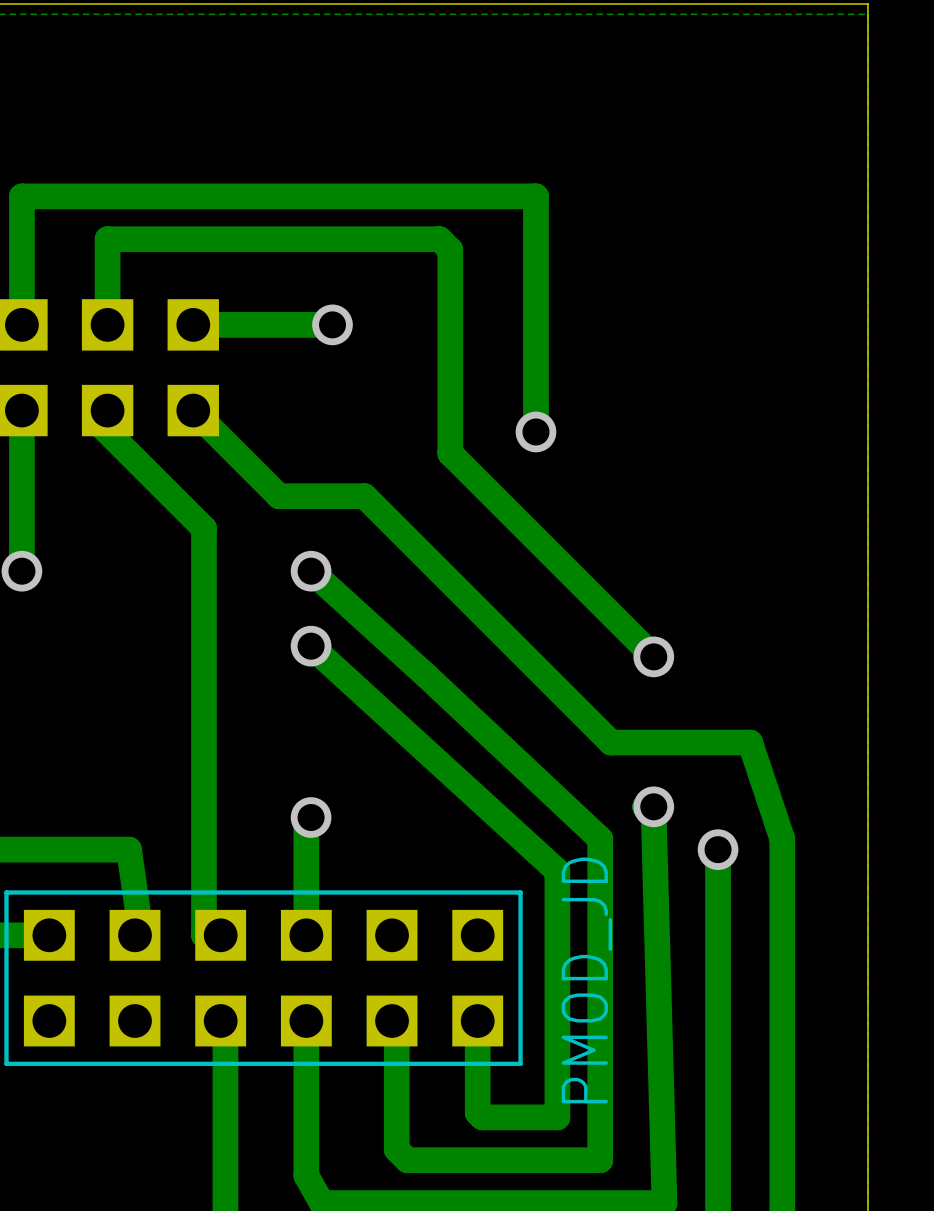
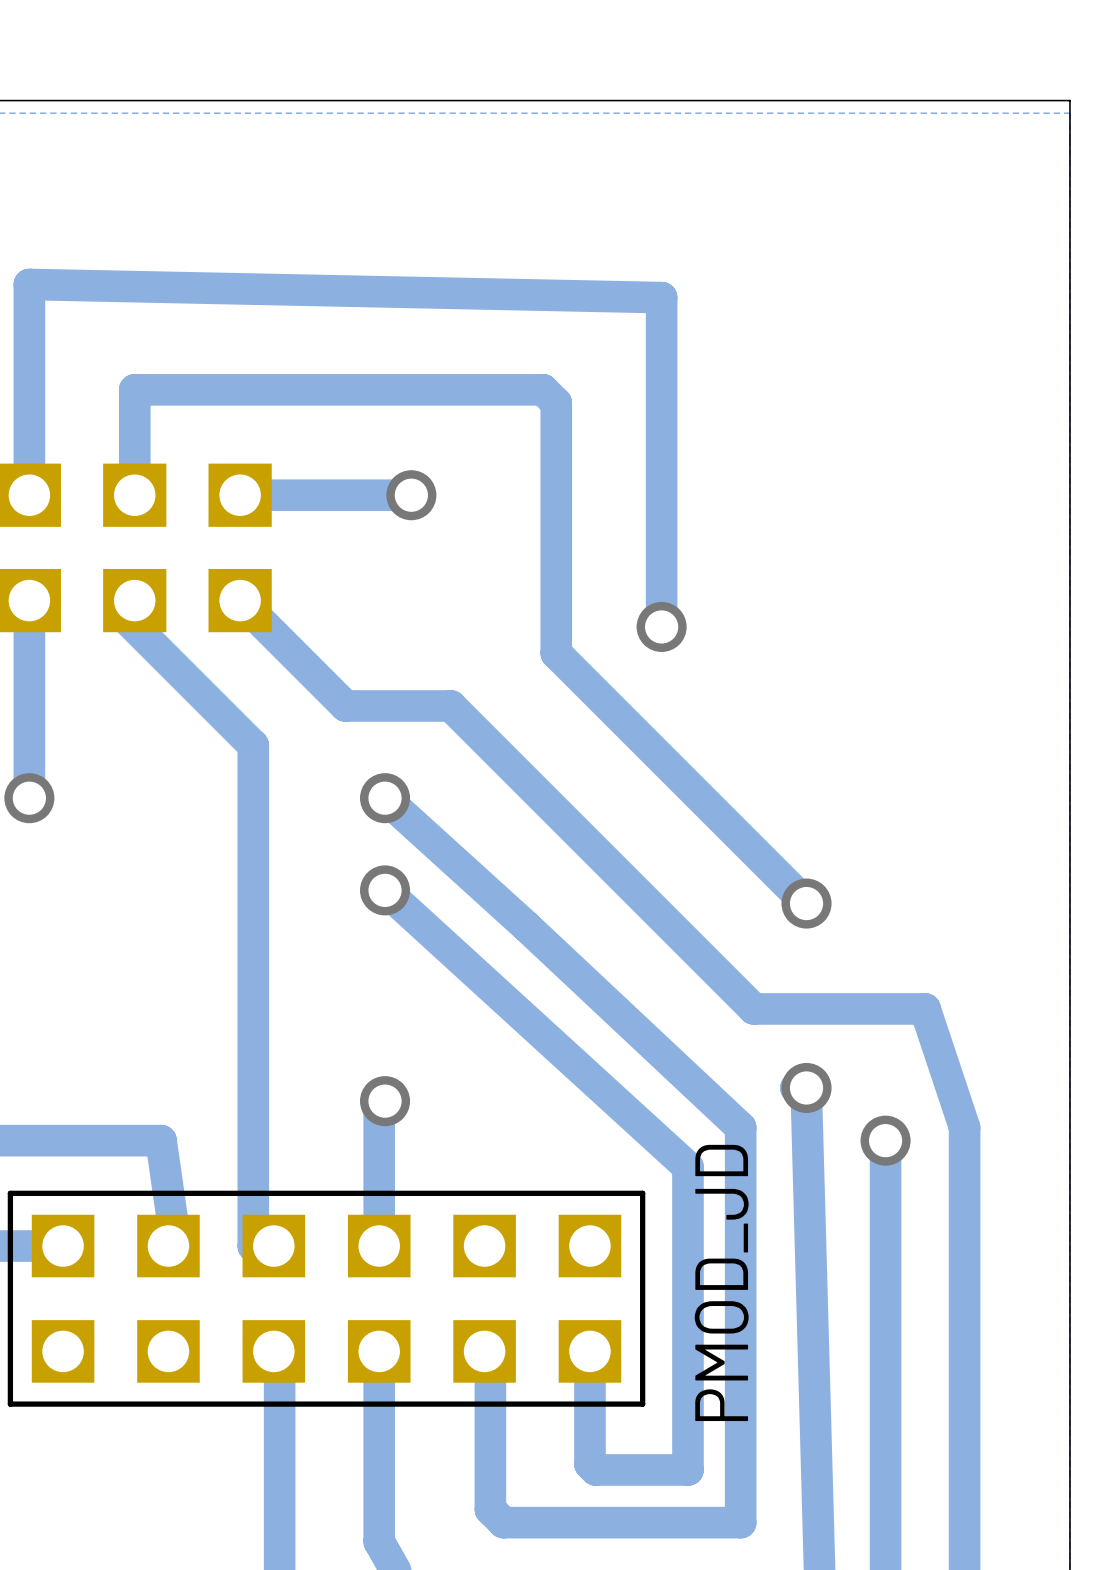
track: (535, 196) (21, 196) -> (661, 337) (661, 297) (29, 284) (29, 337)

